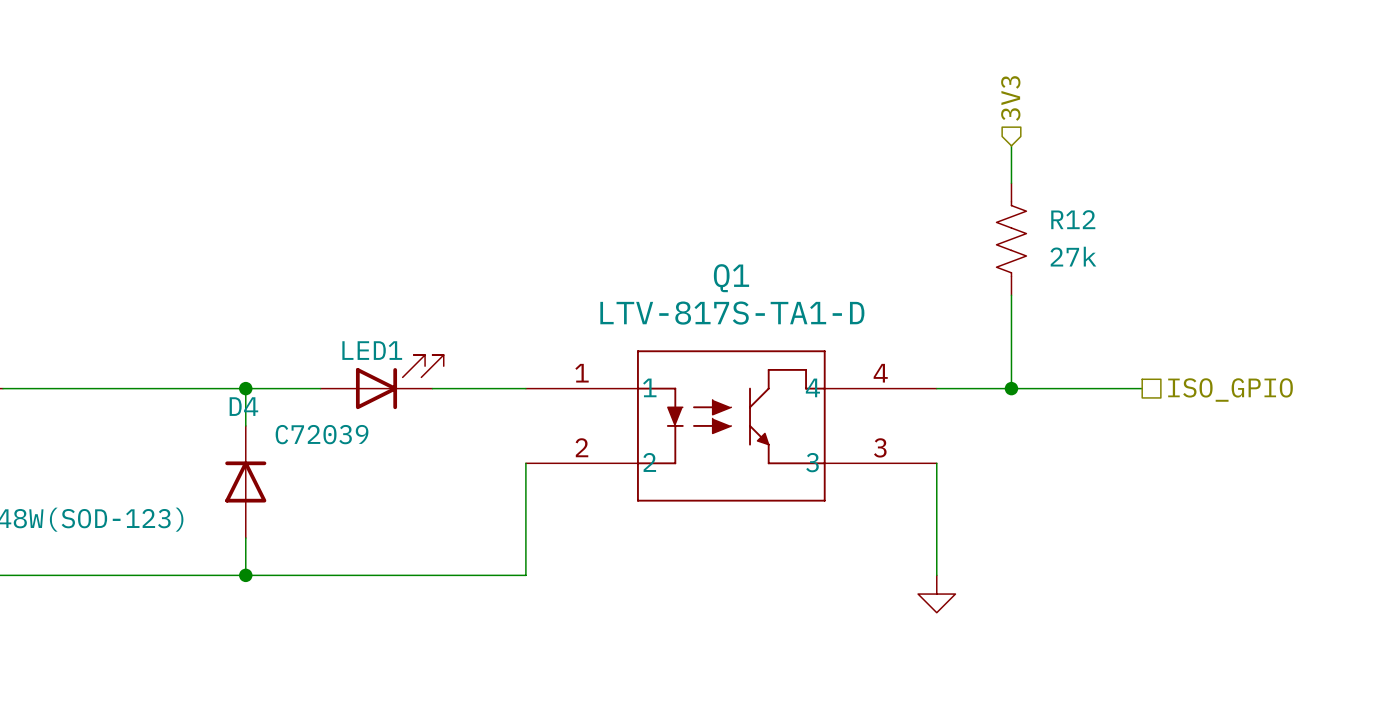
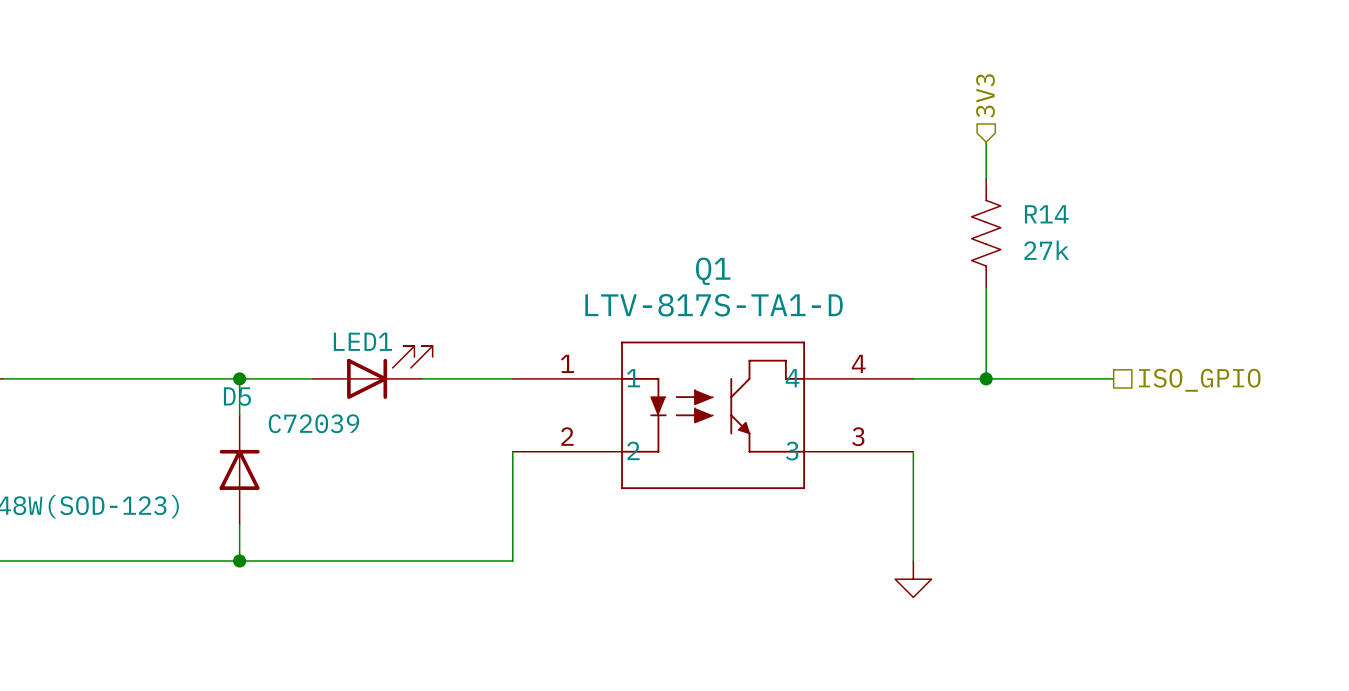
R12 name: R12 (1073, 219) -> R14 (1046, 214)
D4 name: D4 (243, 406) -> D5 (237, 396)

